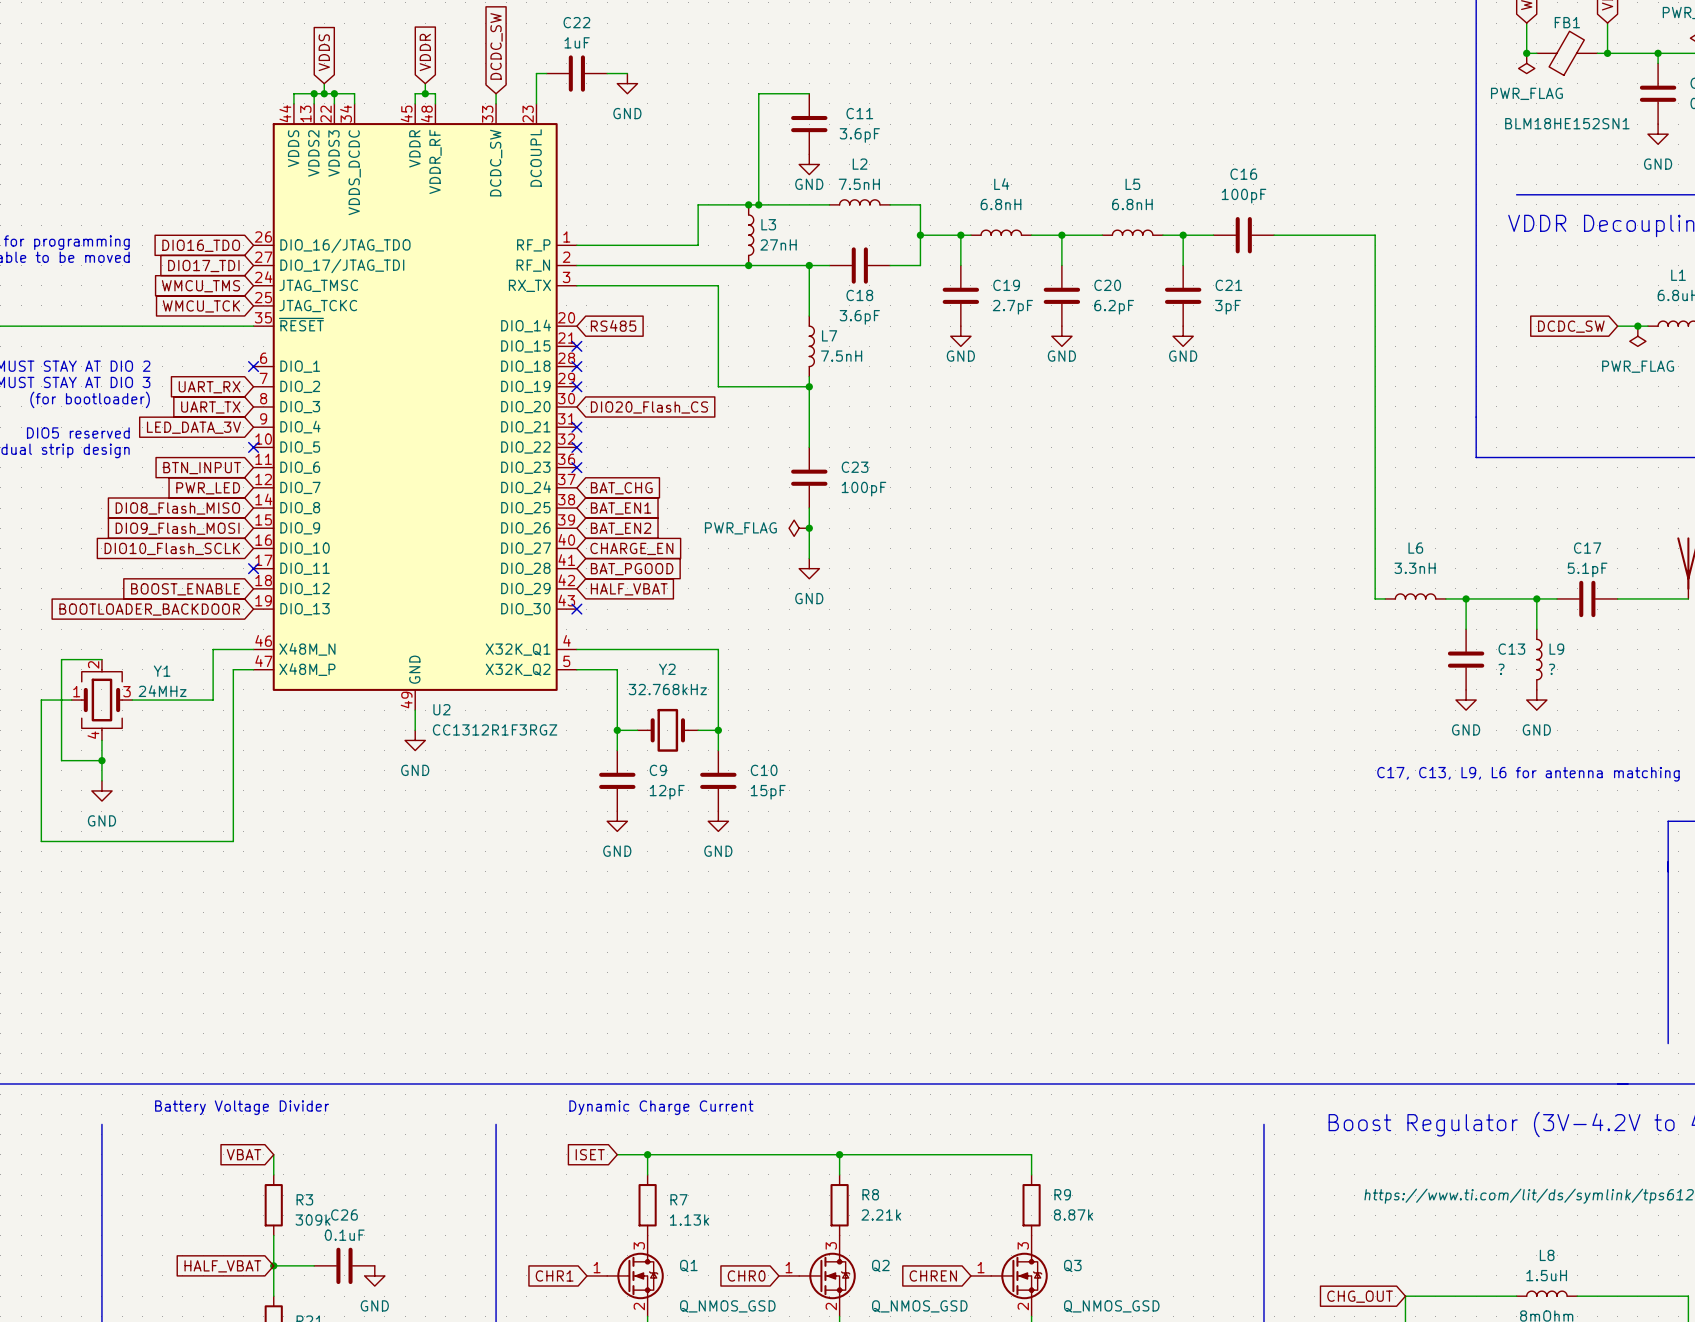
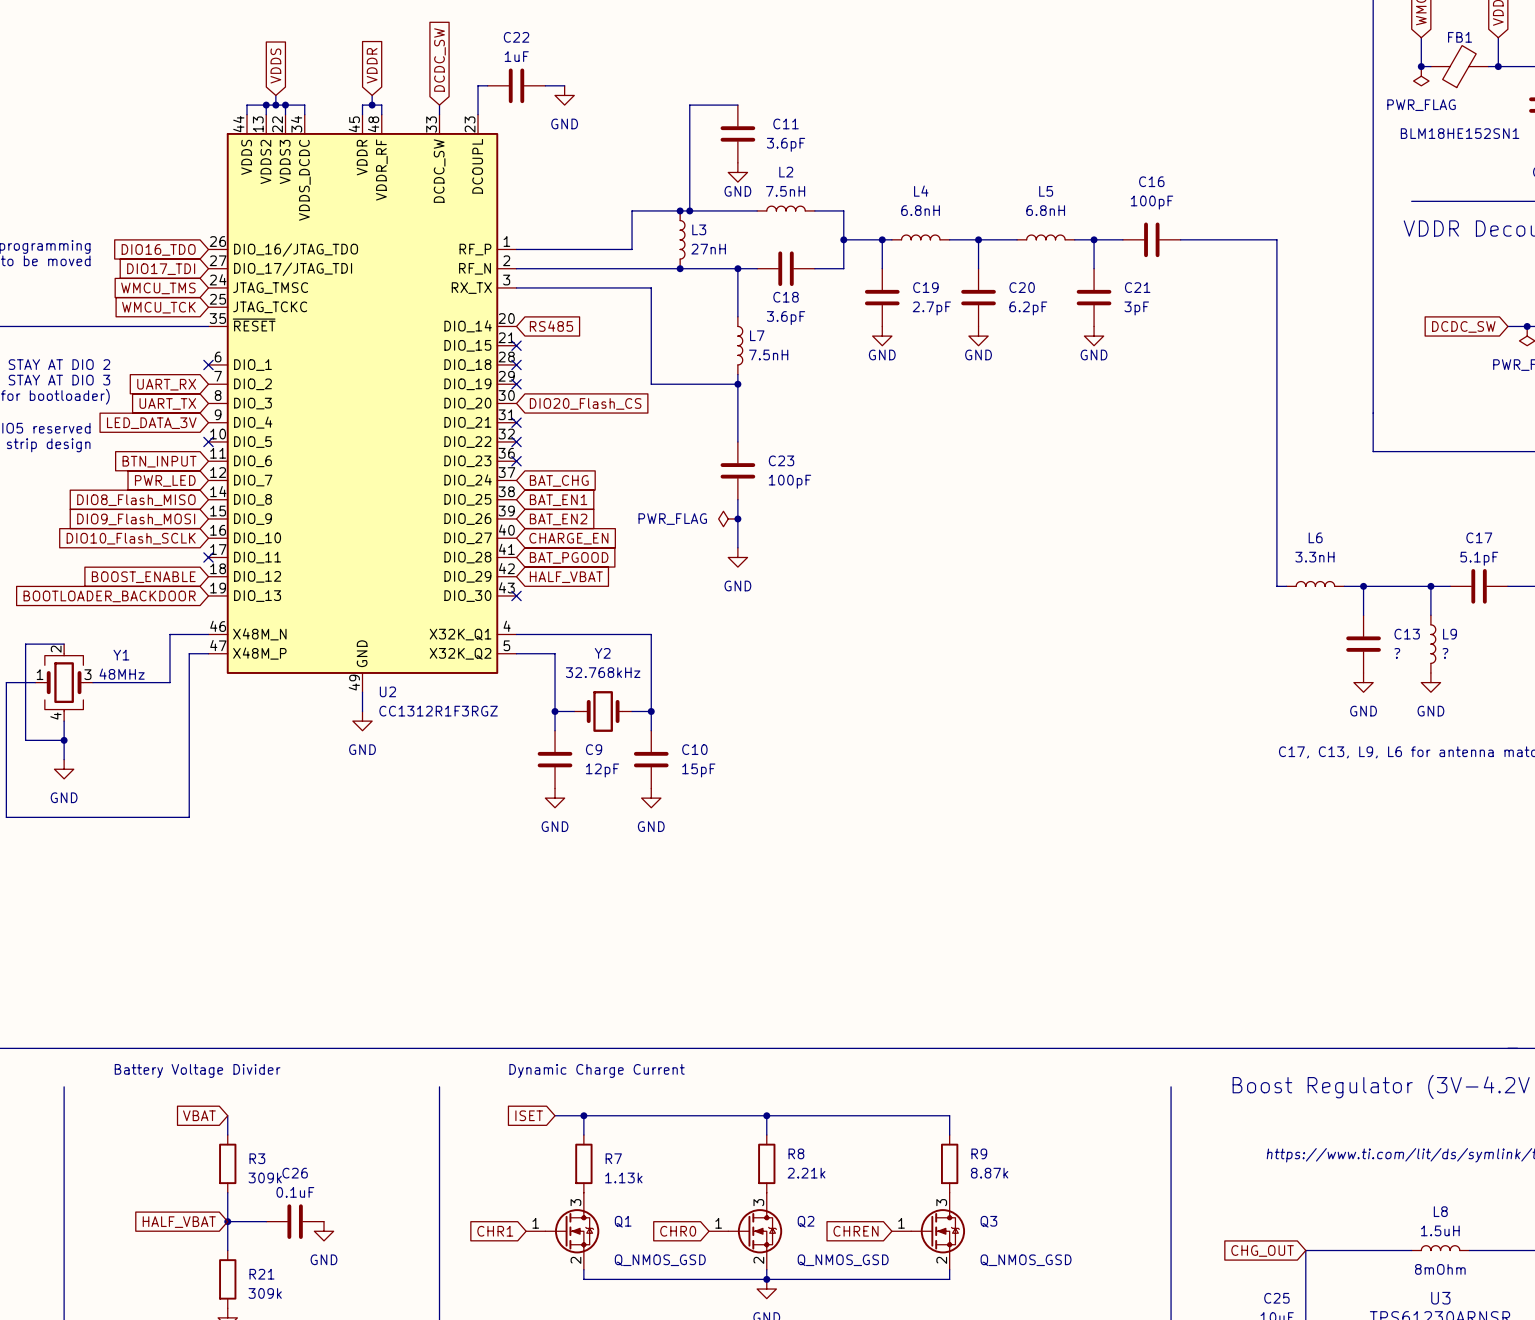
Y1 value: 24MHz (162, 691) -> 48MHz (122, 674)

